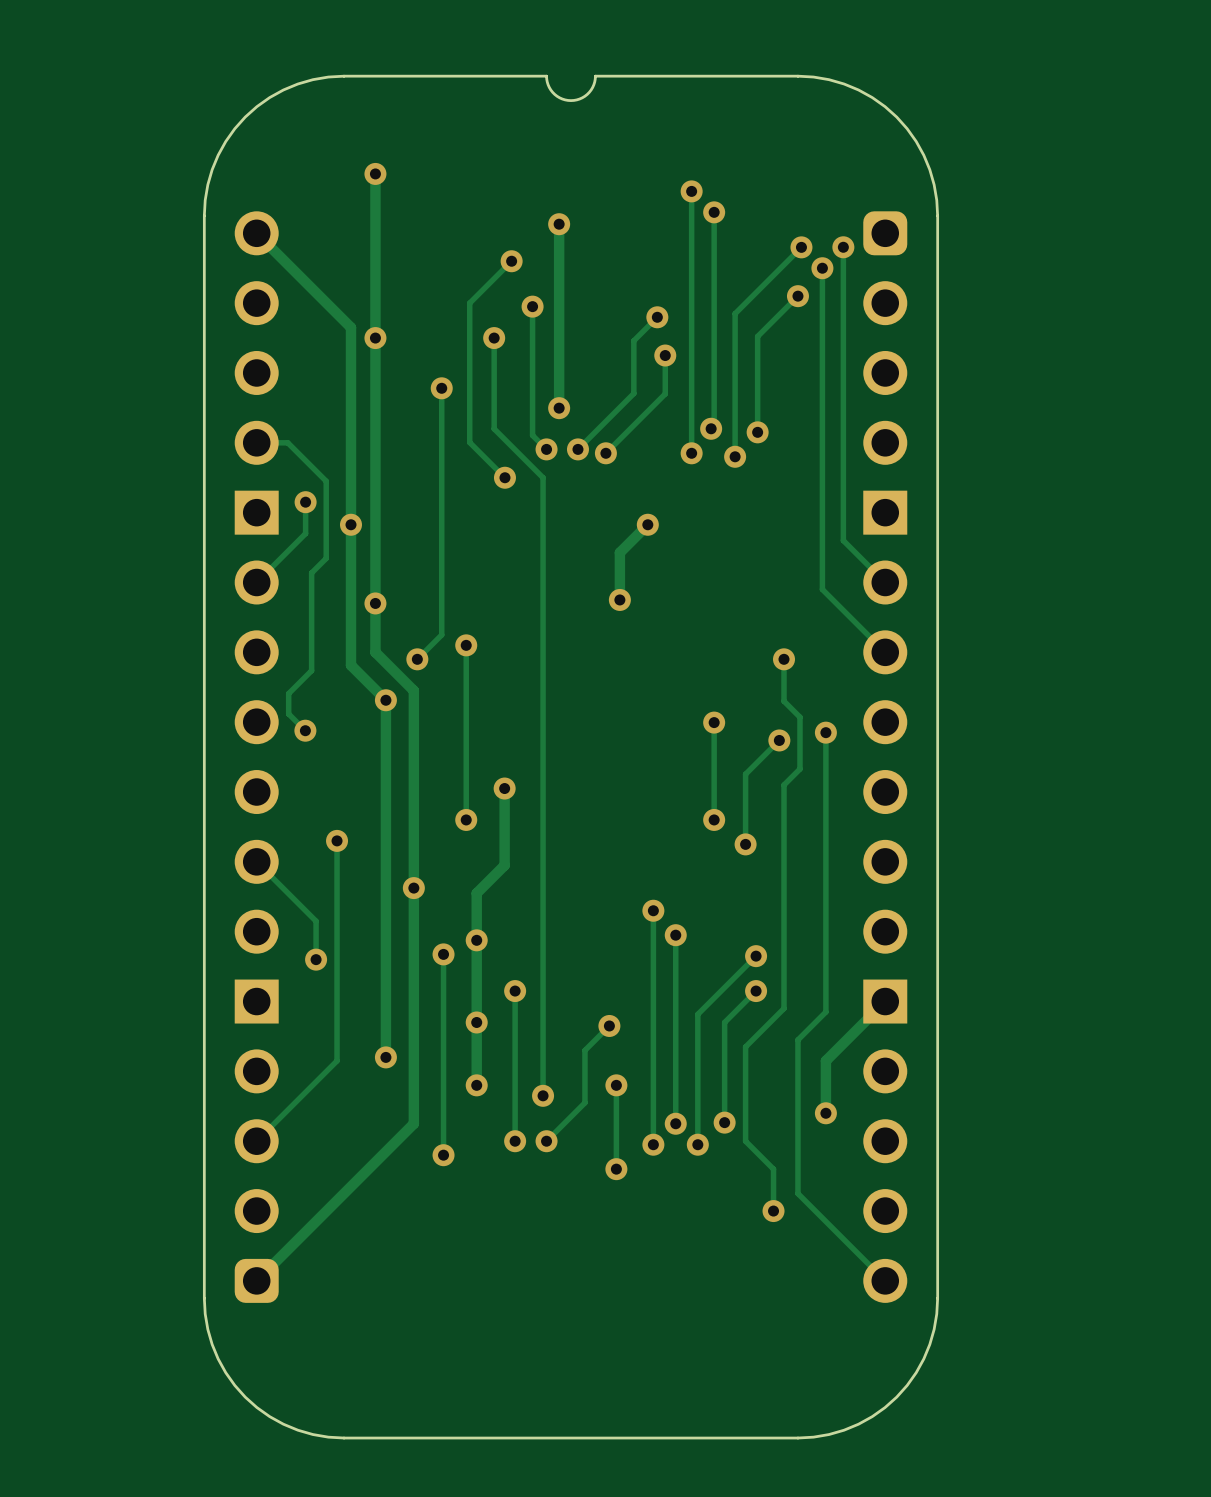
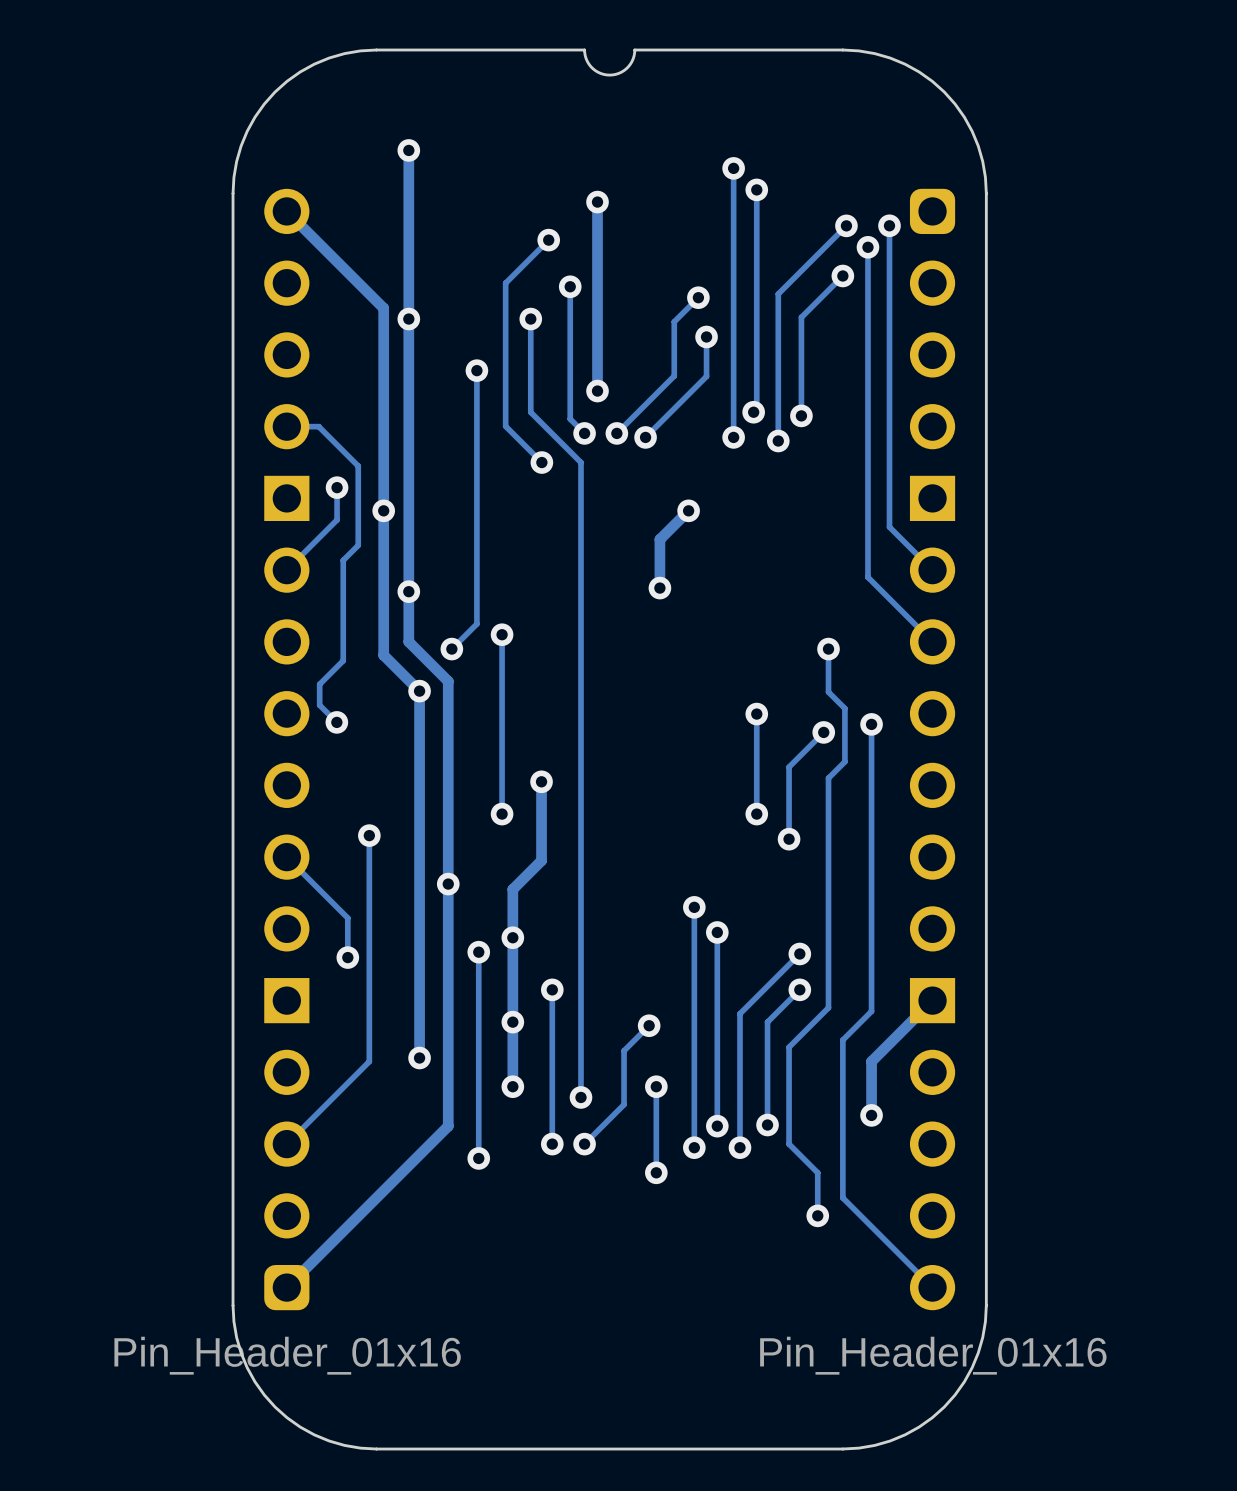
drawing: none -> [114, 1336, 461, 1375]
drawing: none -> [760, 1336, 1107, 1375]

